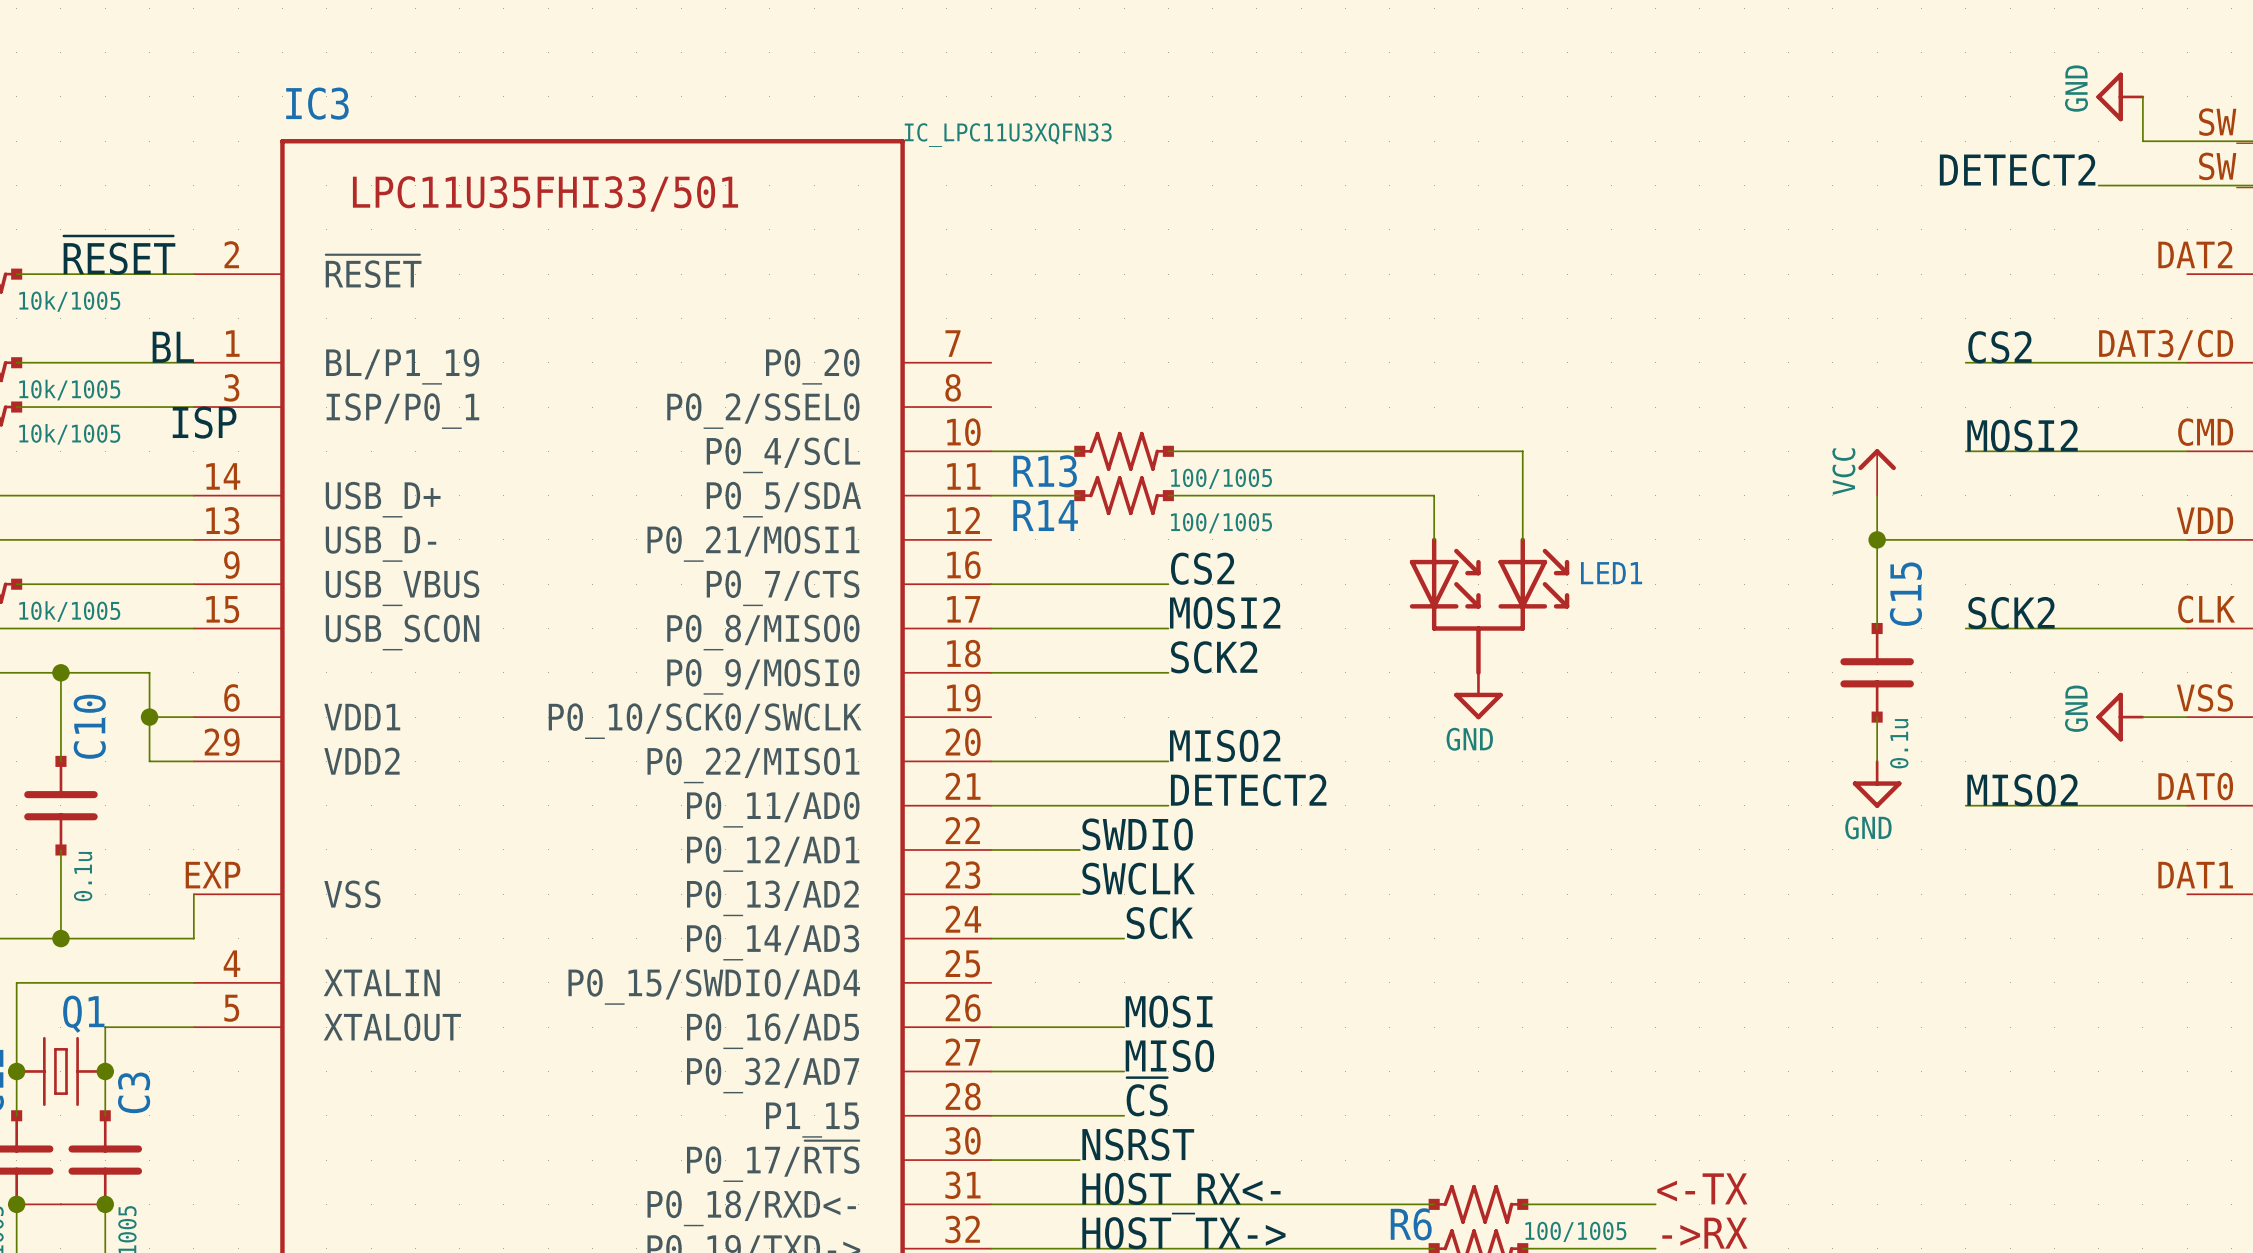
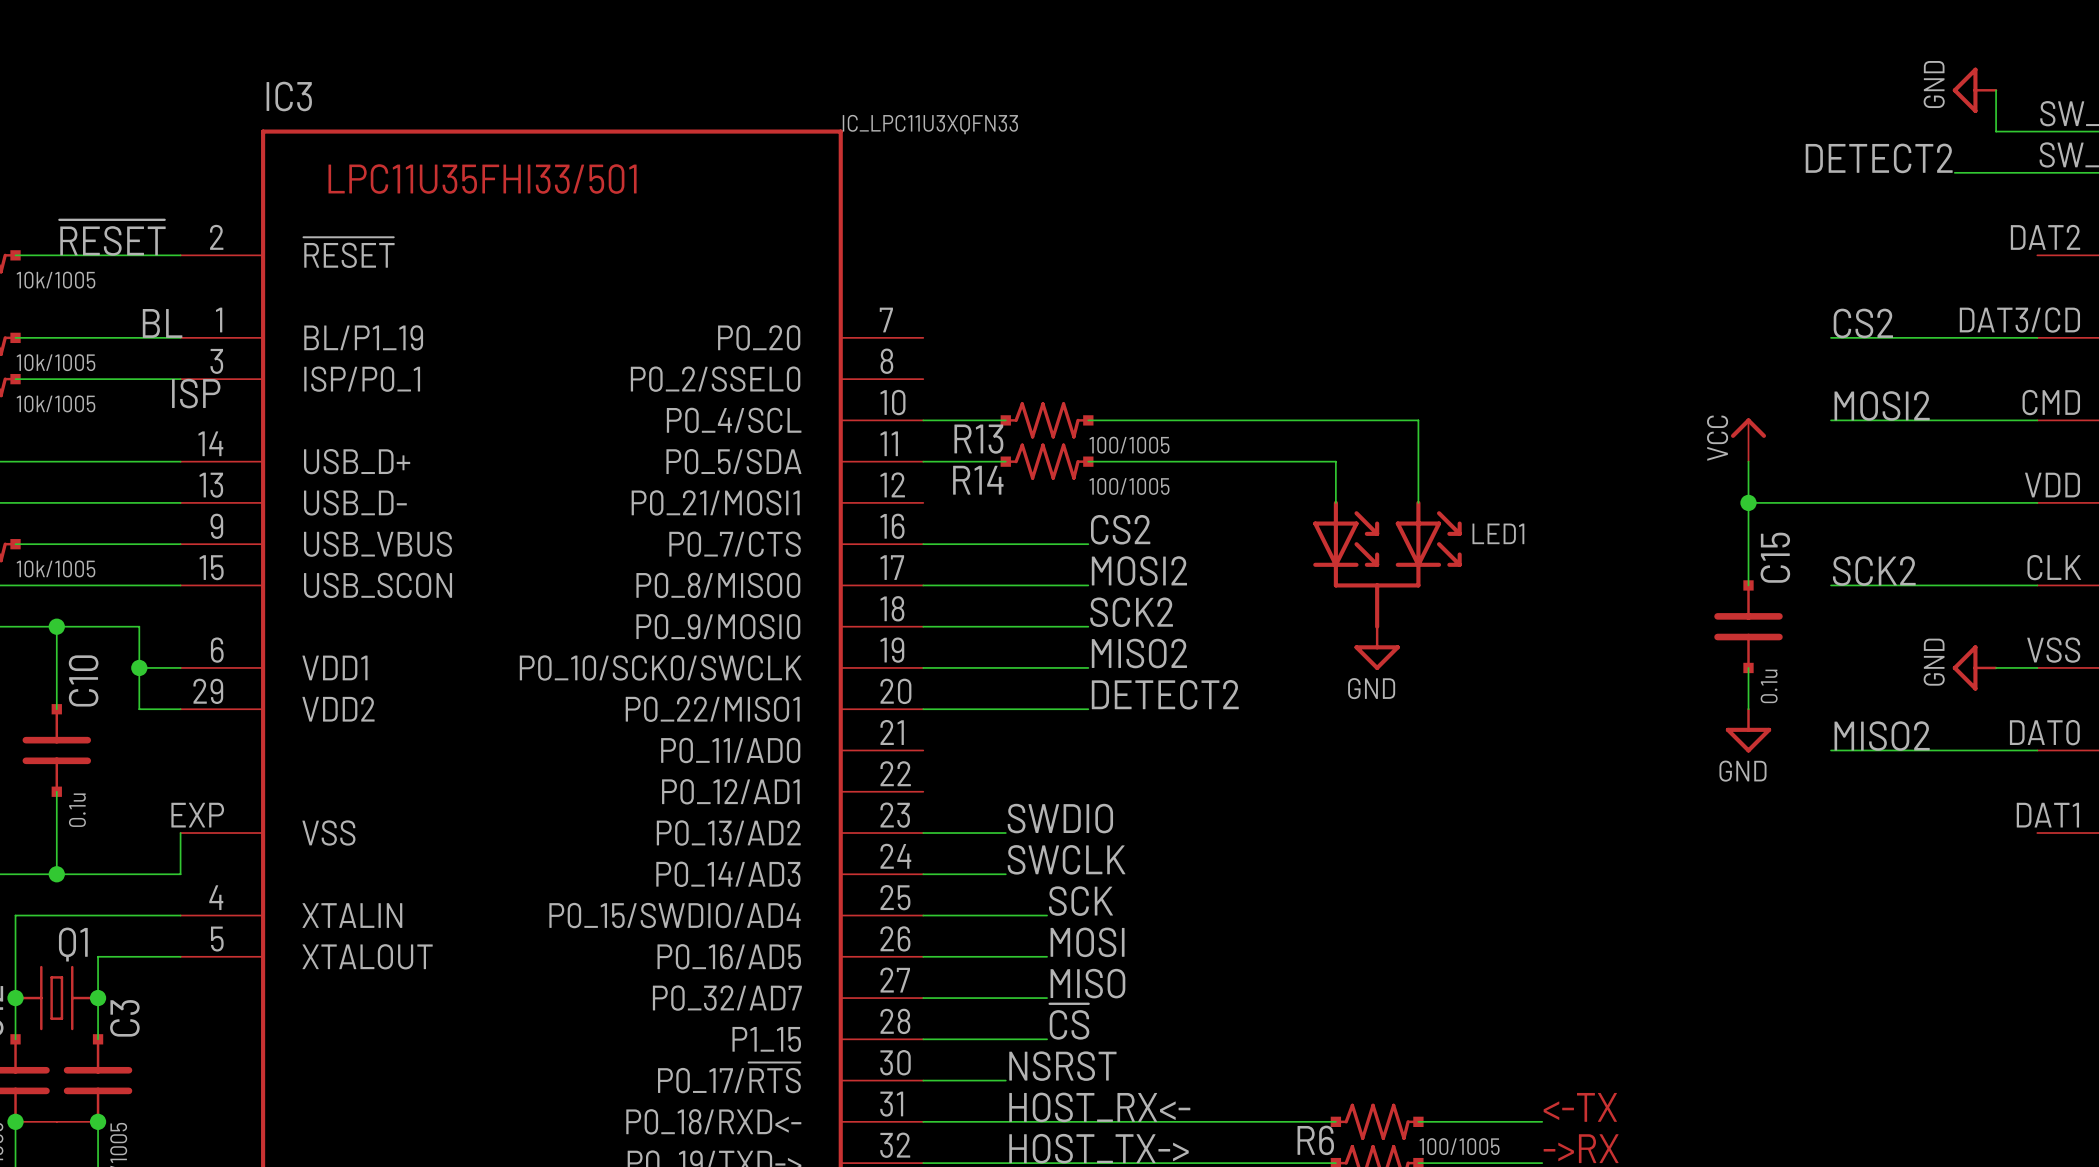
label: none -> MISO2 (1139, 653)
label: MISO2 (1225, 745) -> DETECT2 (1165, 694)
label: DETECT2 (1248, 790) -> none
wire: (991, 805) (1168, 805) -> (923, 667) (1088, 667)
label: SWDIO (1137, 834) -> none
wire: (991, 849) (1079, 849) -> none
label: SWCLK (1138, 878) -> SWDIO (1060, 818)
label: none -> SWCLK (1066, 859)
label position: SCK (1159, 923) -> SCK (1080, 901)
wire: (1079, 938) (1124, 938) -> none
wire: none -> (923, 915) (1047, 915)

